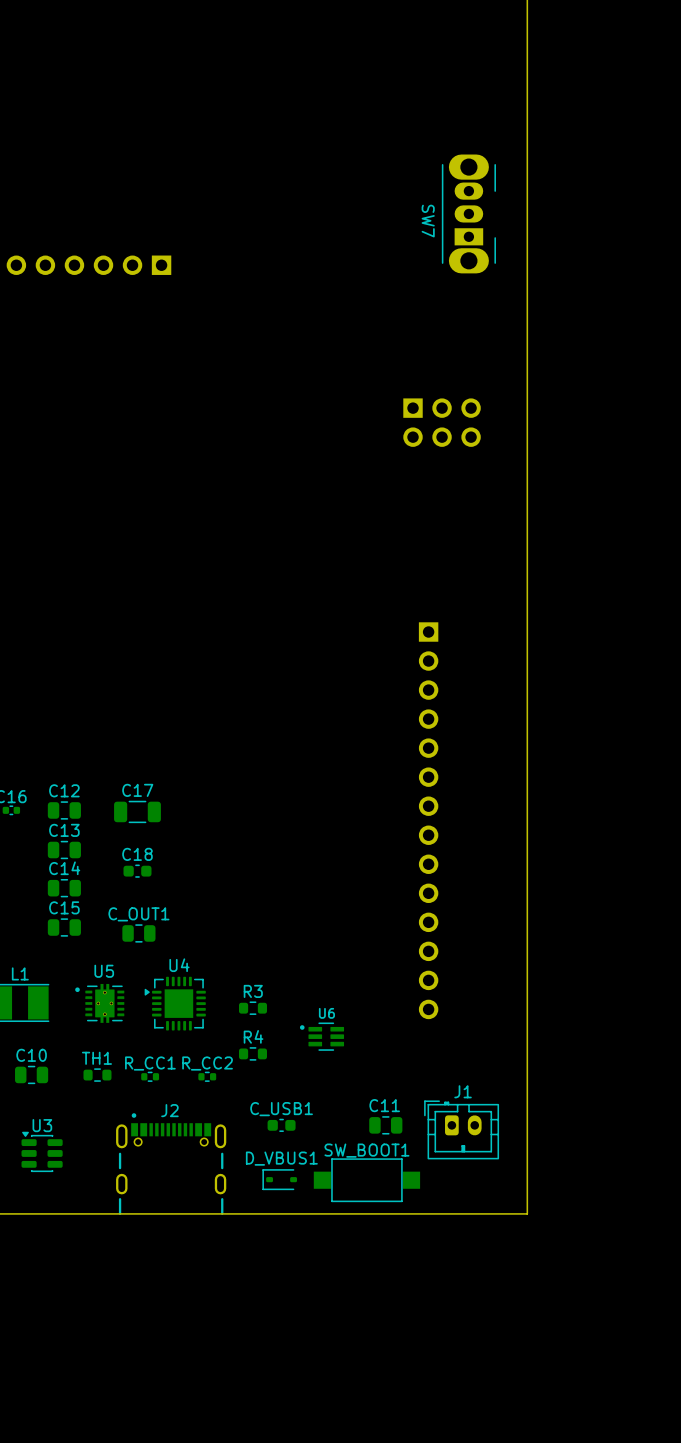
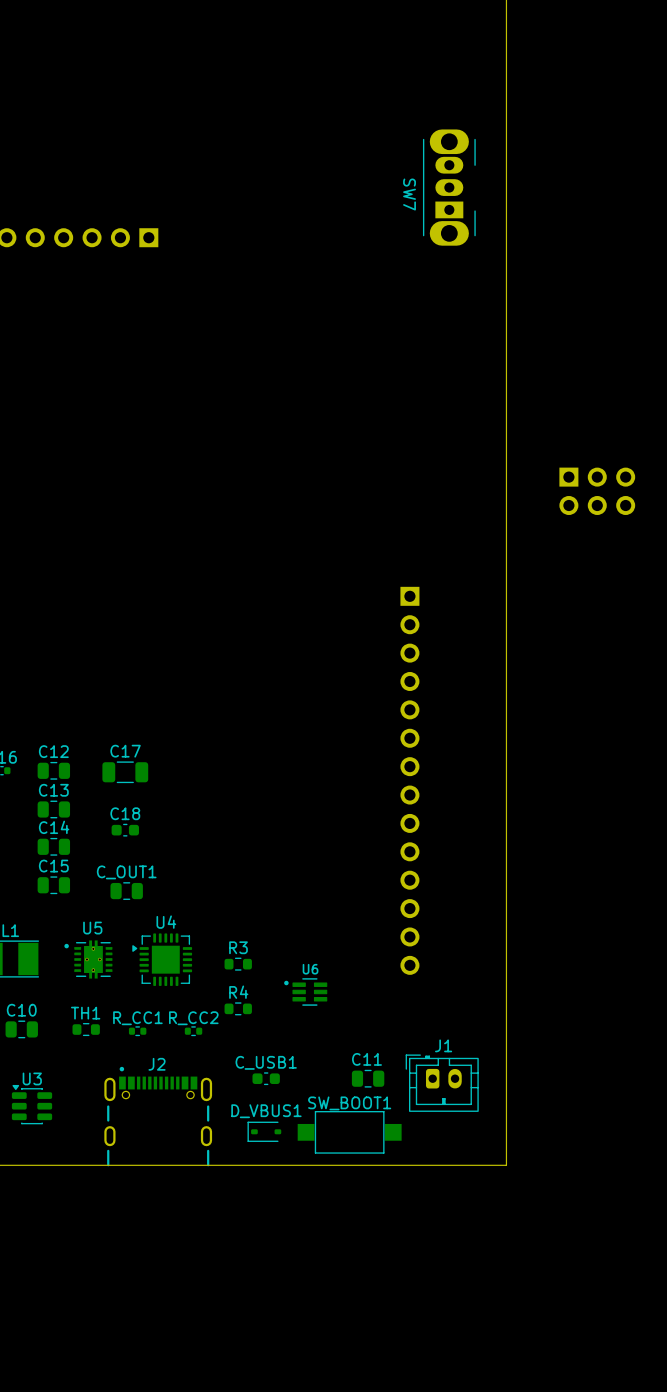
part position: (442, 422) -> (597, 491)

